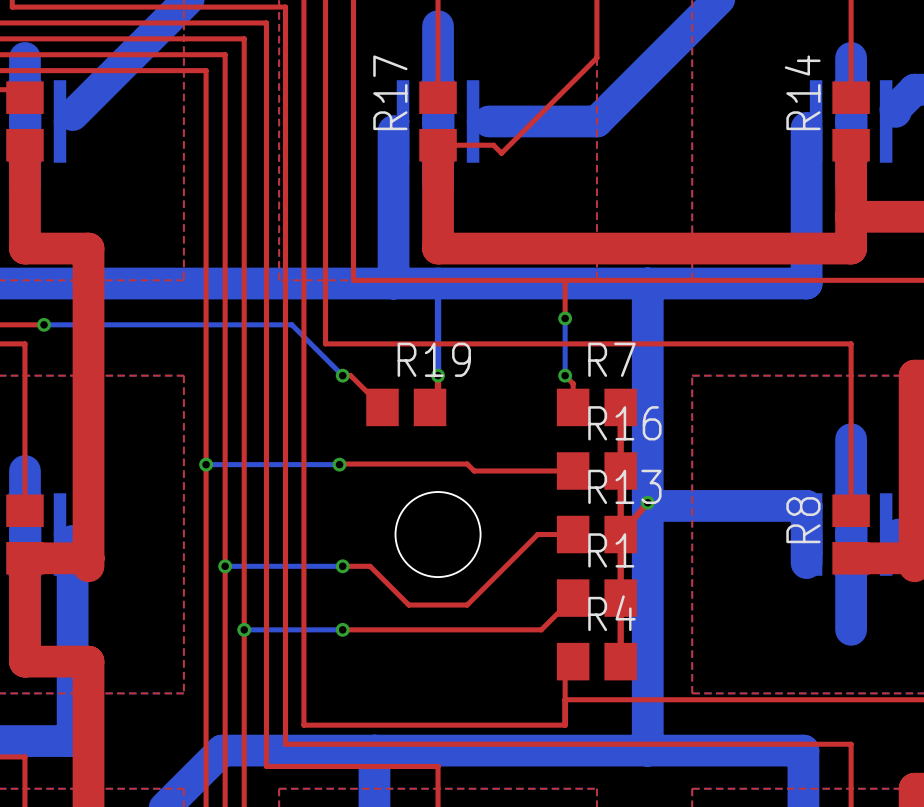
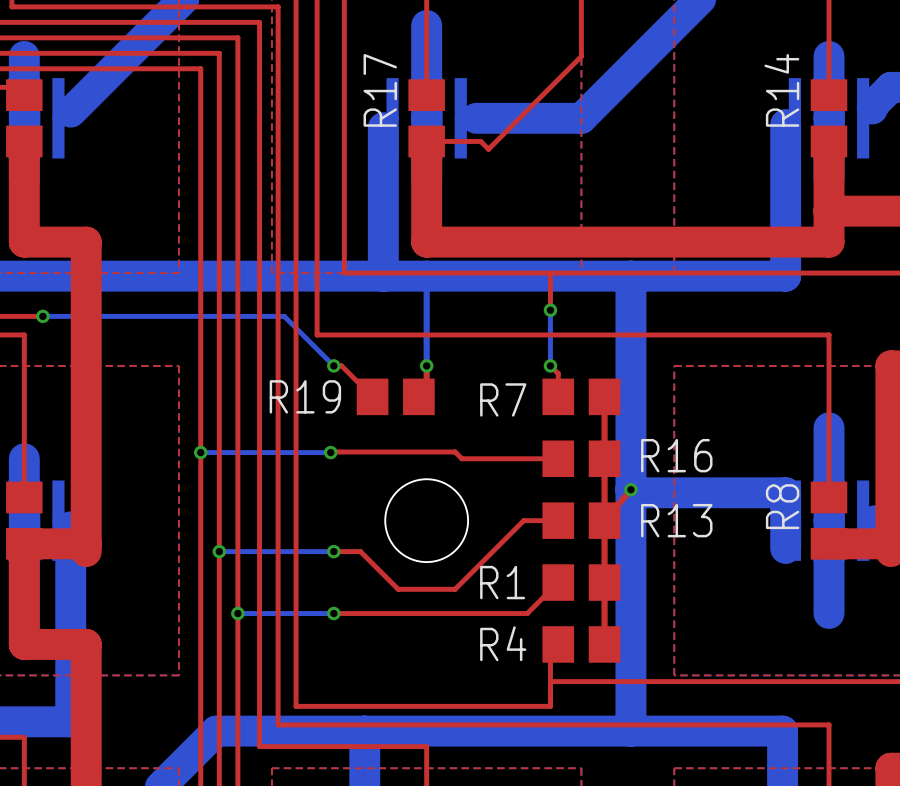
R19 name position: R19 (434, 359) -> R19 (305, 396)
R7 name position: R7 (611, 359) -> R7 (503, 399)
R16 name position: R16 (624, 423) -> R16 (676, 455)
R13 name position: R13 (624, 486) -> R13 (676, 520)
R1 name position: R1 (611, 550) -> R1 (502, 582)
R4 name position: R4 (611, 613) -> R4 (503, 643)

